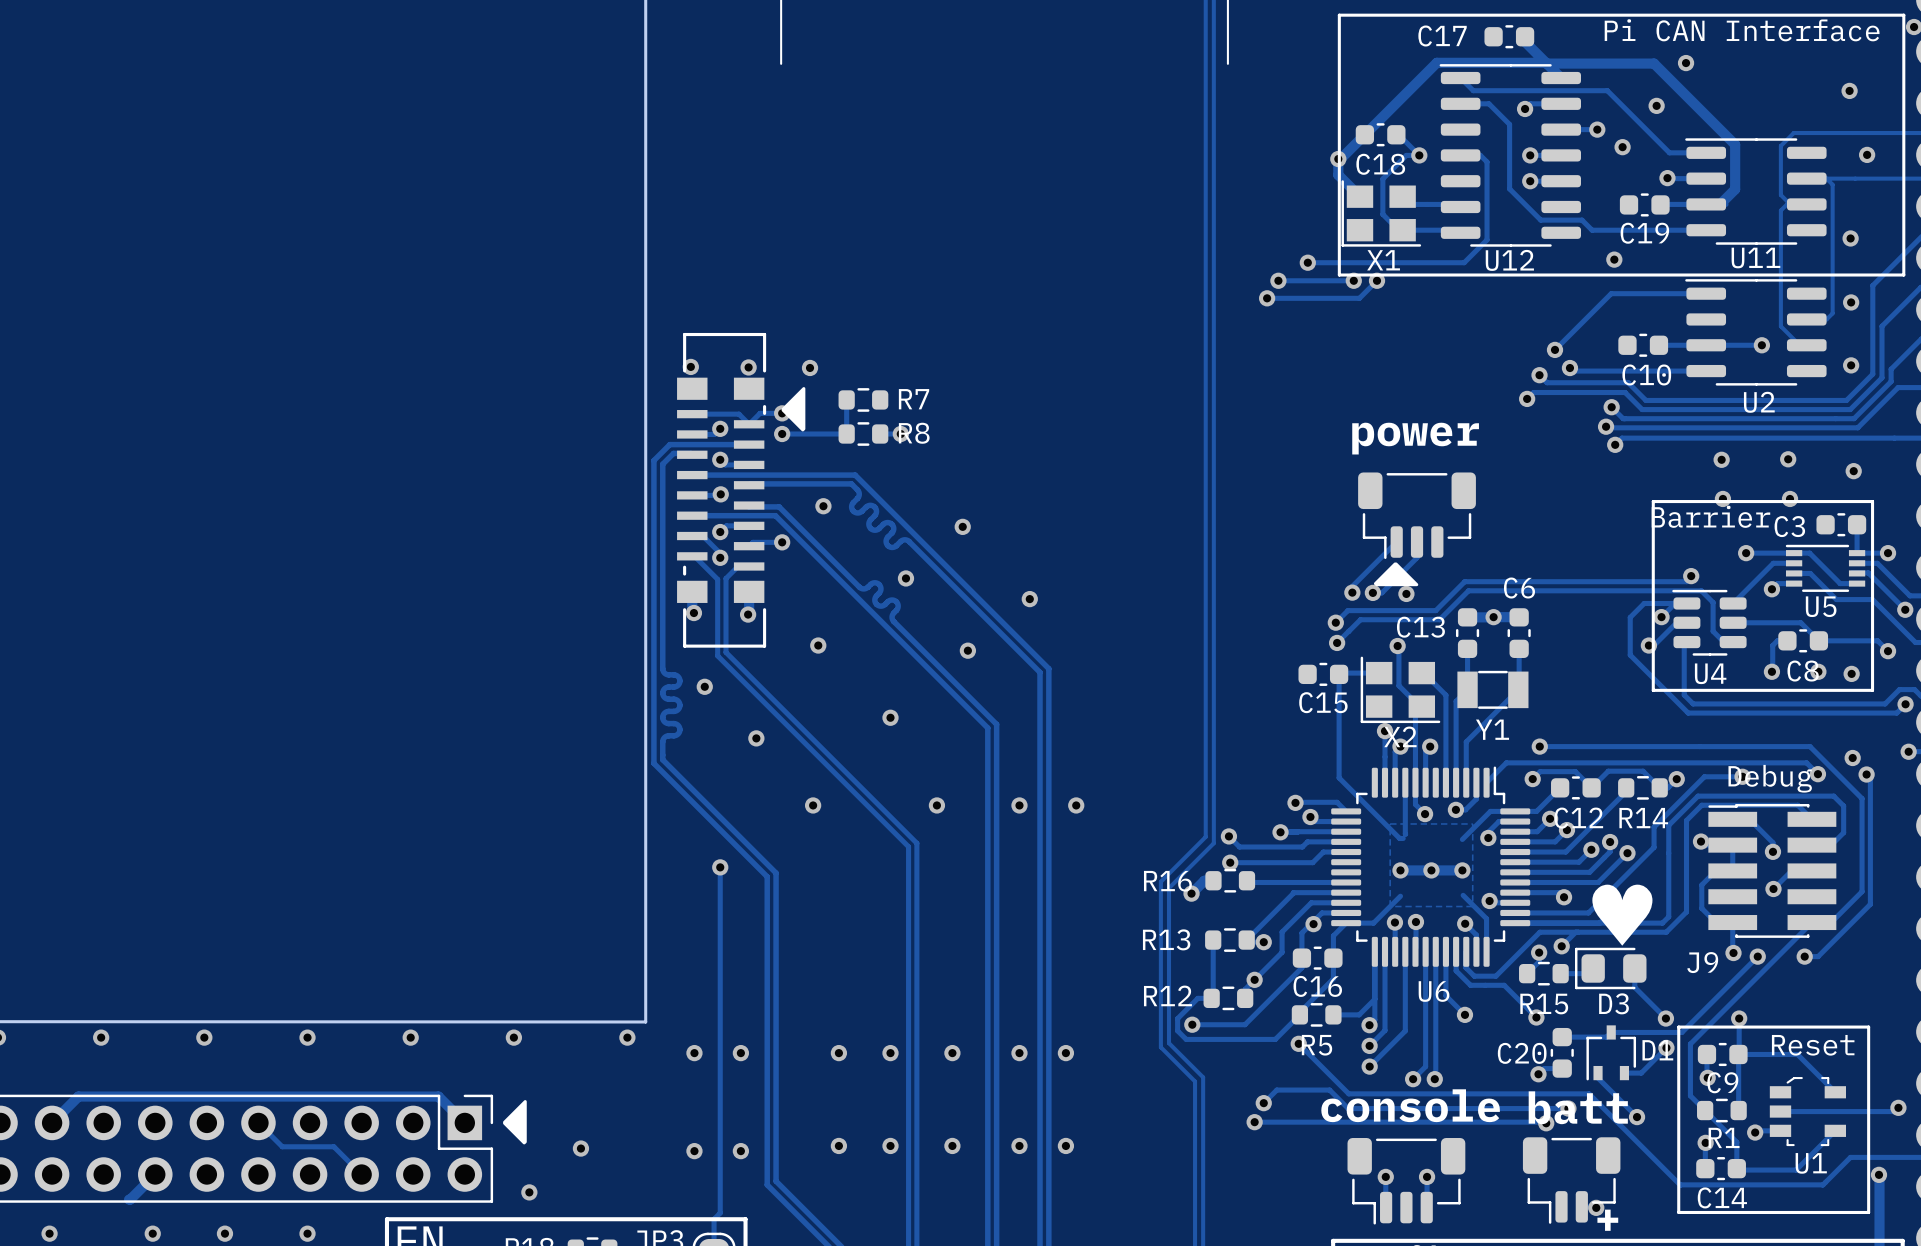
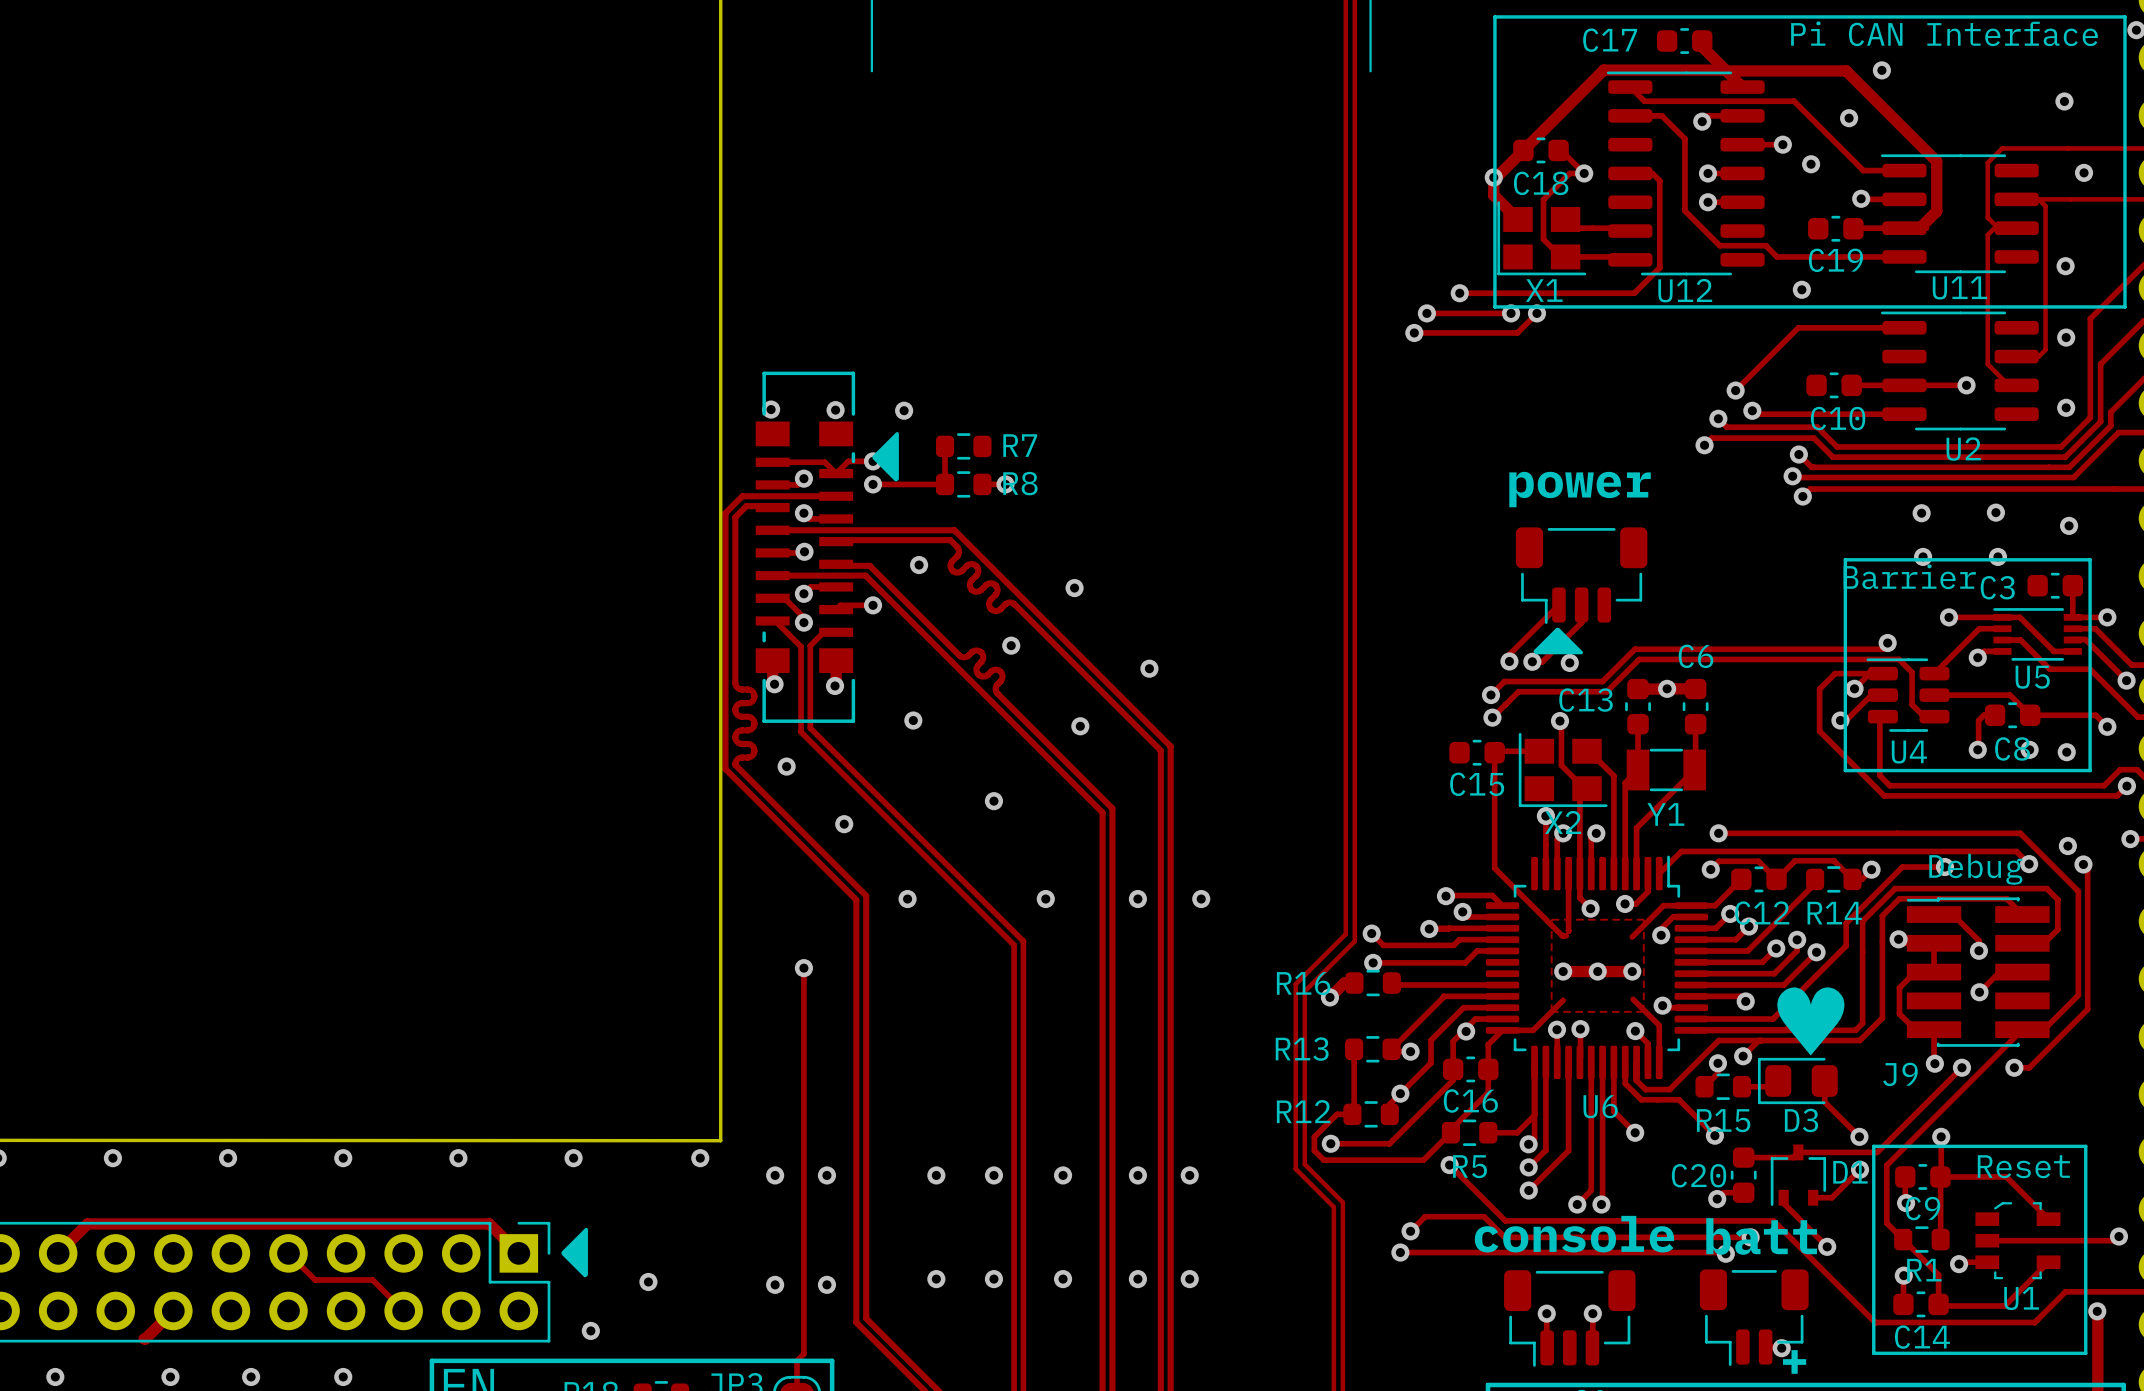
track: (669, 444) (653, 460) (653, 763) (767, 876) -> (747, 496) (742, 496) (725, 513) (725, 769) (856, 899) (856, 978)
track: (673, 453) (662, 464) (662, 668) (665, 673) (676, 675) (679, 680) (677, 685) (665, 687) (662, 693) (665, 697) (676, 700) (679, 705) (677, 710) (665, 712) (662, 717) (665, 722) (677, 724) (679, 729) (676, 734) (667, 735) (663, 738) (662, 759) (776, 873) -> (751, 506) (746, 506) (735, 517) (735, 682) (738, 688) (751, 690) (754, 697) (750, 702) (738, 704) (735, 709) (738, 715) (751, 718) (754, 724) (750, 729) (738, 731) (735, 737) (738, 743) (751, 745) (754, 750) (751, 756) (738, 758) (735, 764) (866, 895) (866, 974)

